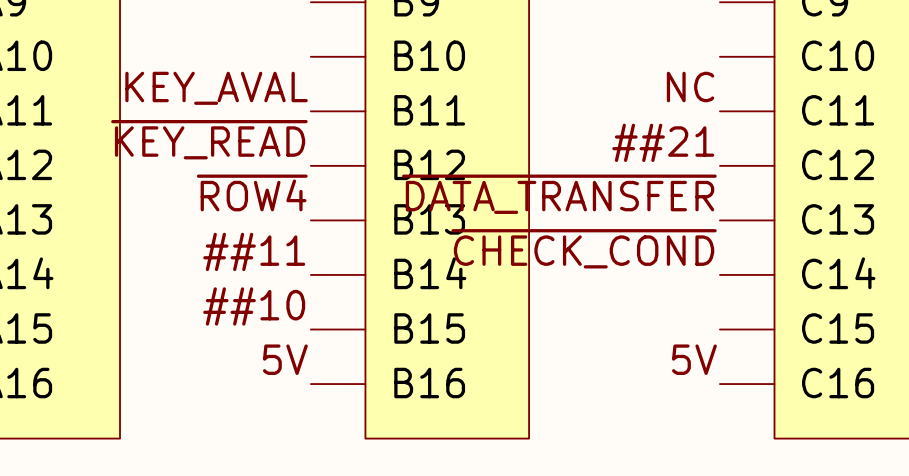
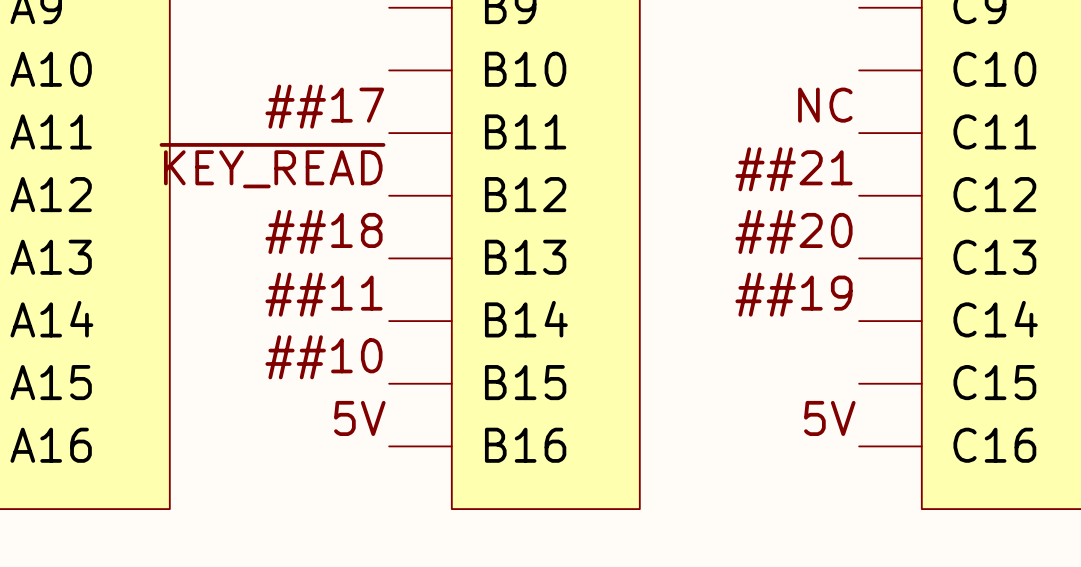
label: KEY_AVAL (216, 88) -> ##17 (324, 106)
label: ~{ROW4} (252, 192) -> ##18 (324, 231)
label: ~{DATA_TRANSFER} (559, 194) -> ##20 (794, 231)
label: ~{CHECK_COND} (584, 248) -> ##19 (794, 294)

